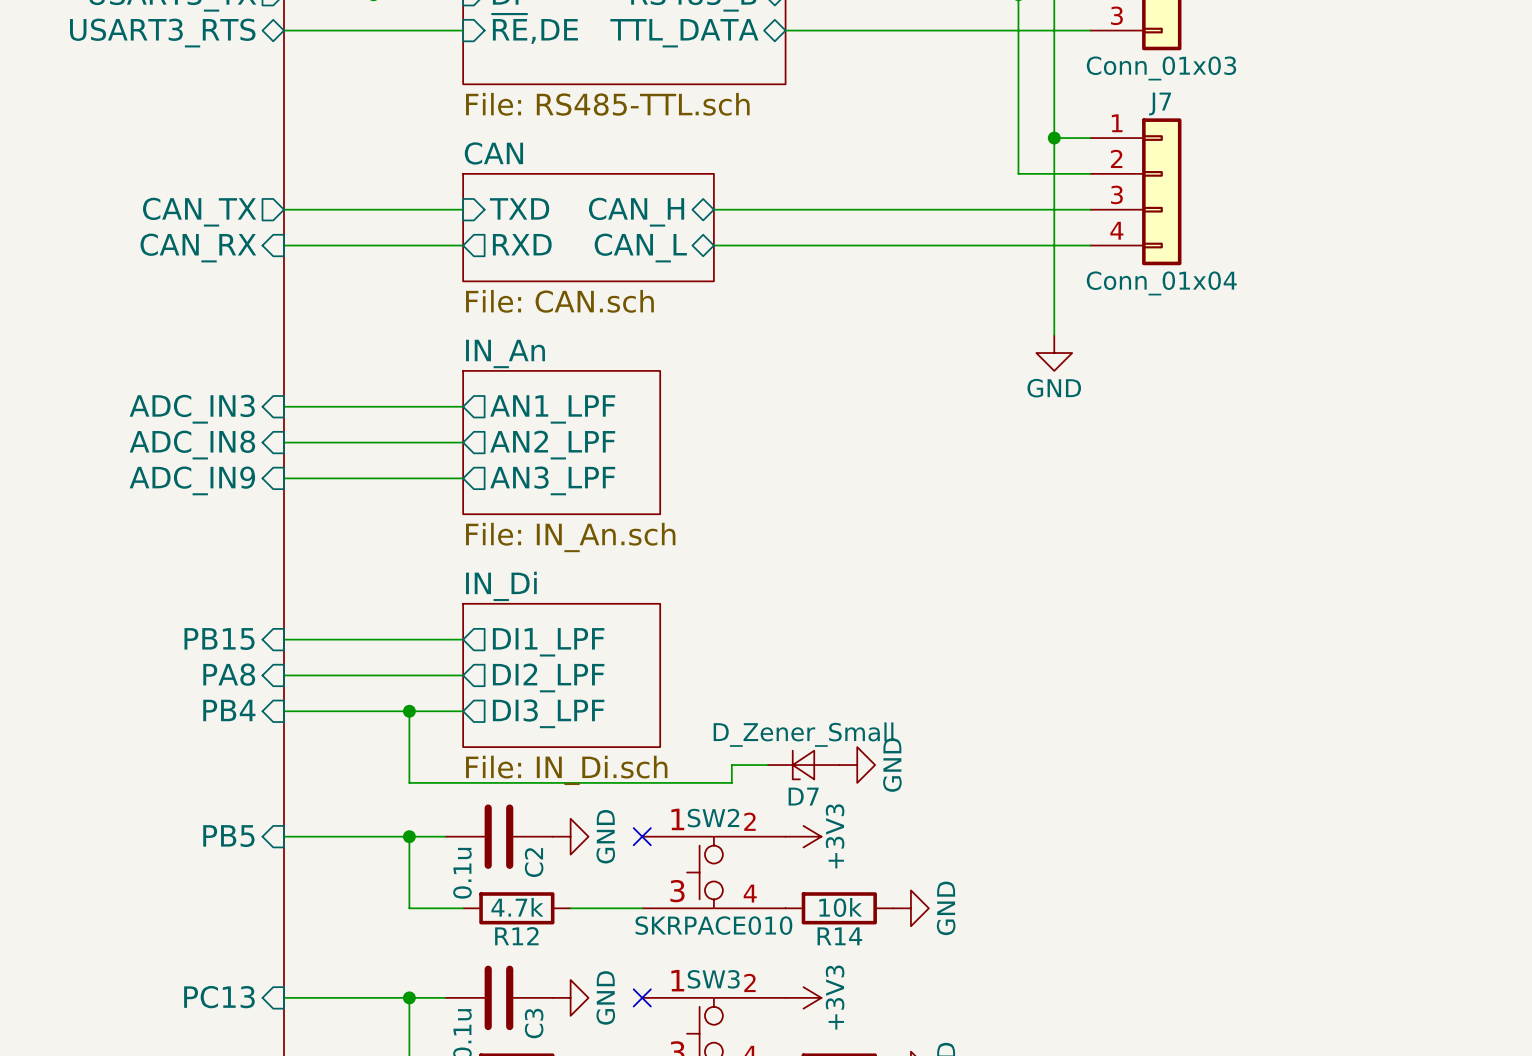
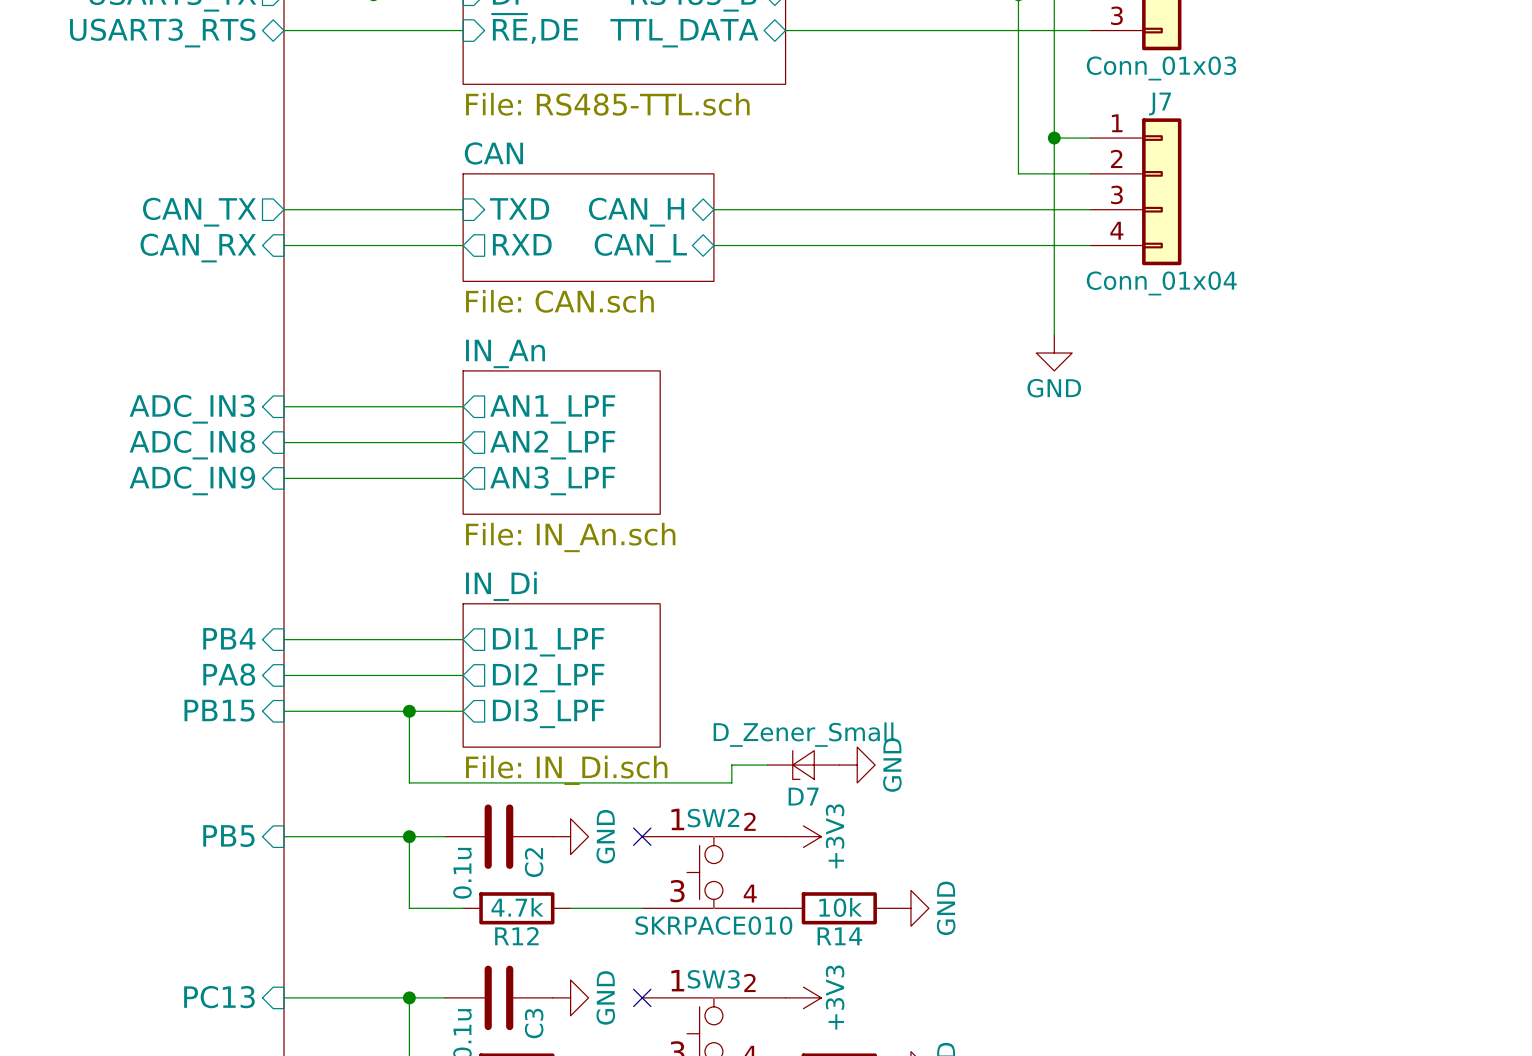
sheet pin: PB15 (219, 639) -> PB4 (229, 638)
sheet pin: PB4 (229, 710) -> PB15 (219, 710)

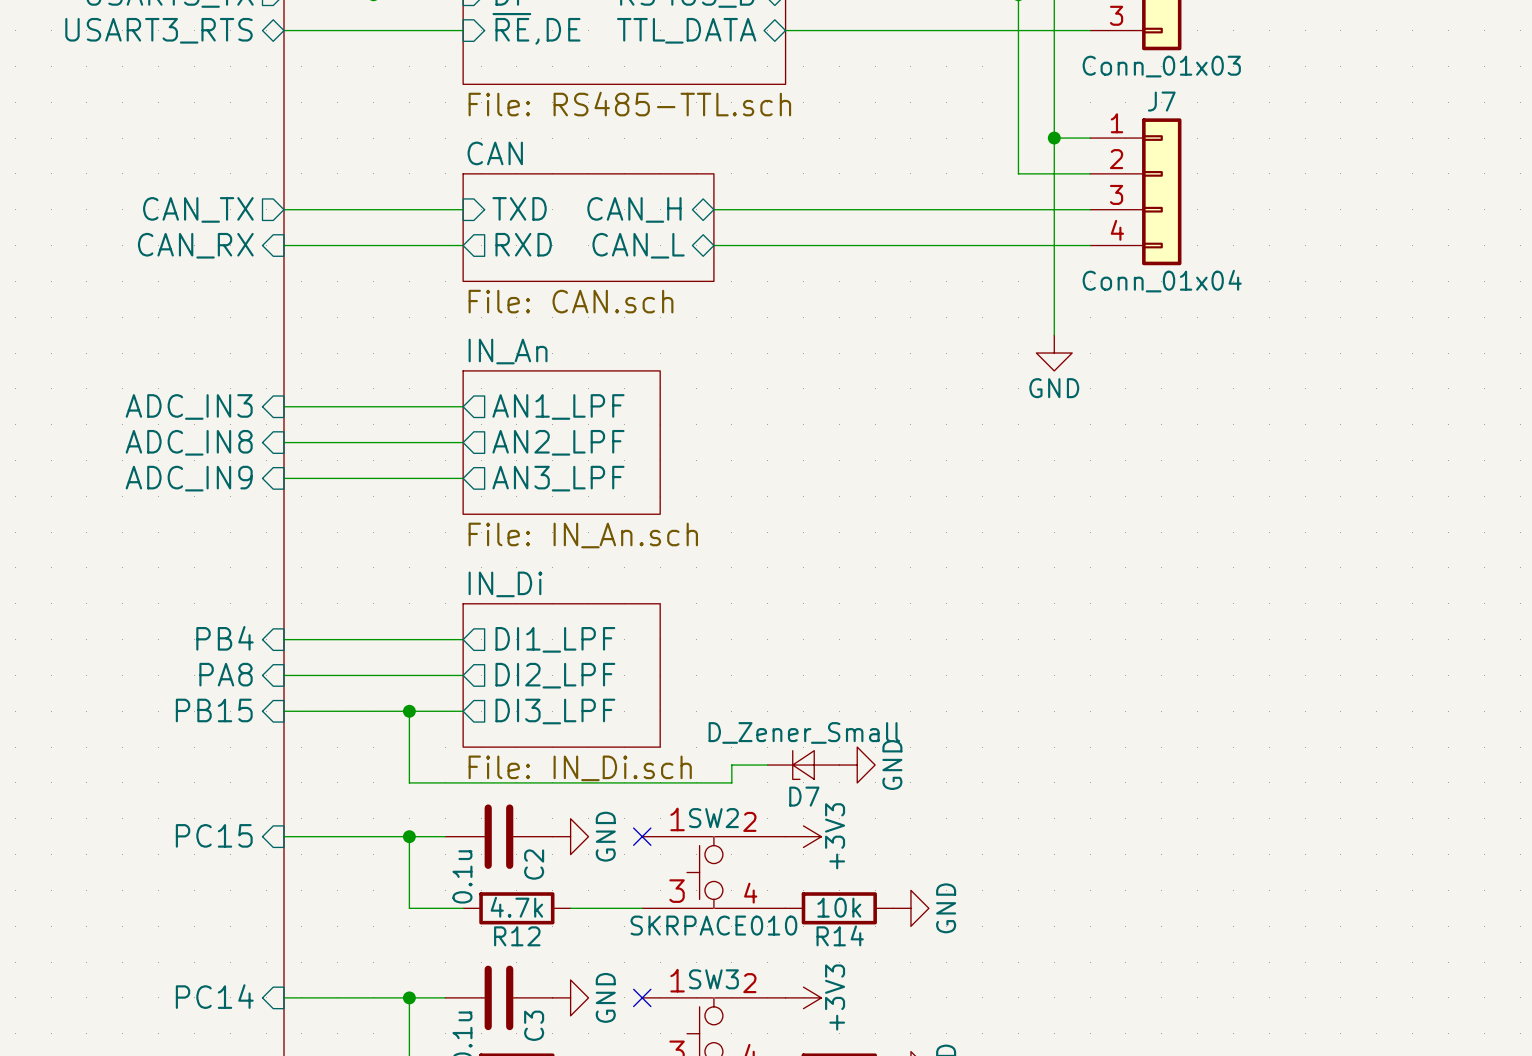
sheet pin: PB5 (228, 836) -> PC15 (214, 835)
sheet pin: PC13 (219, 997) -> PC14 (214, 996)

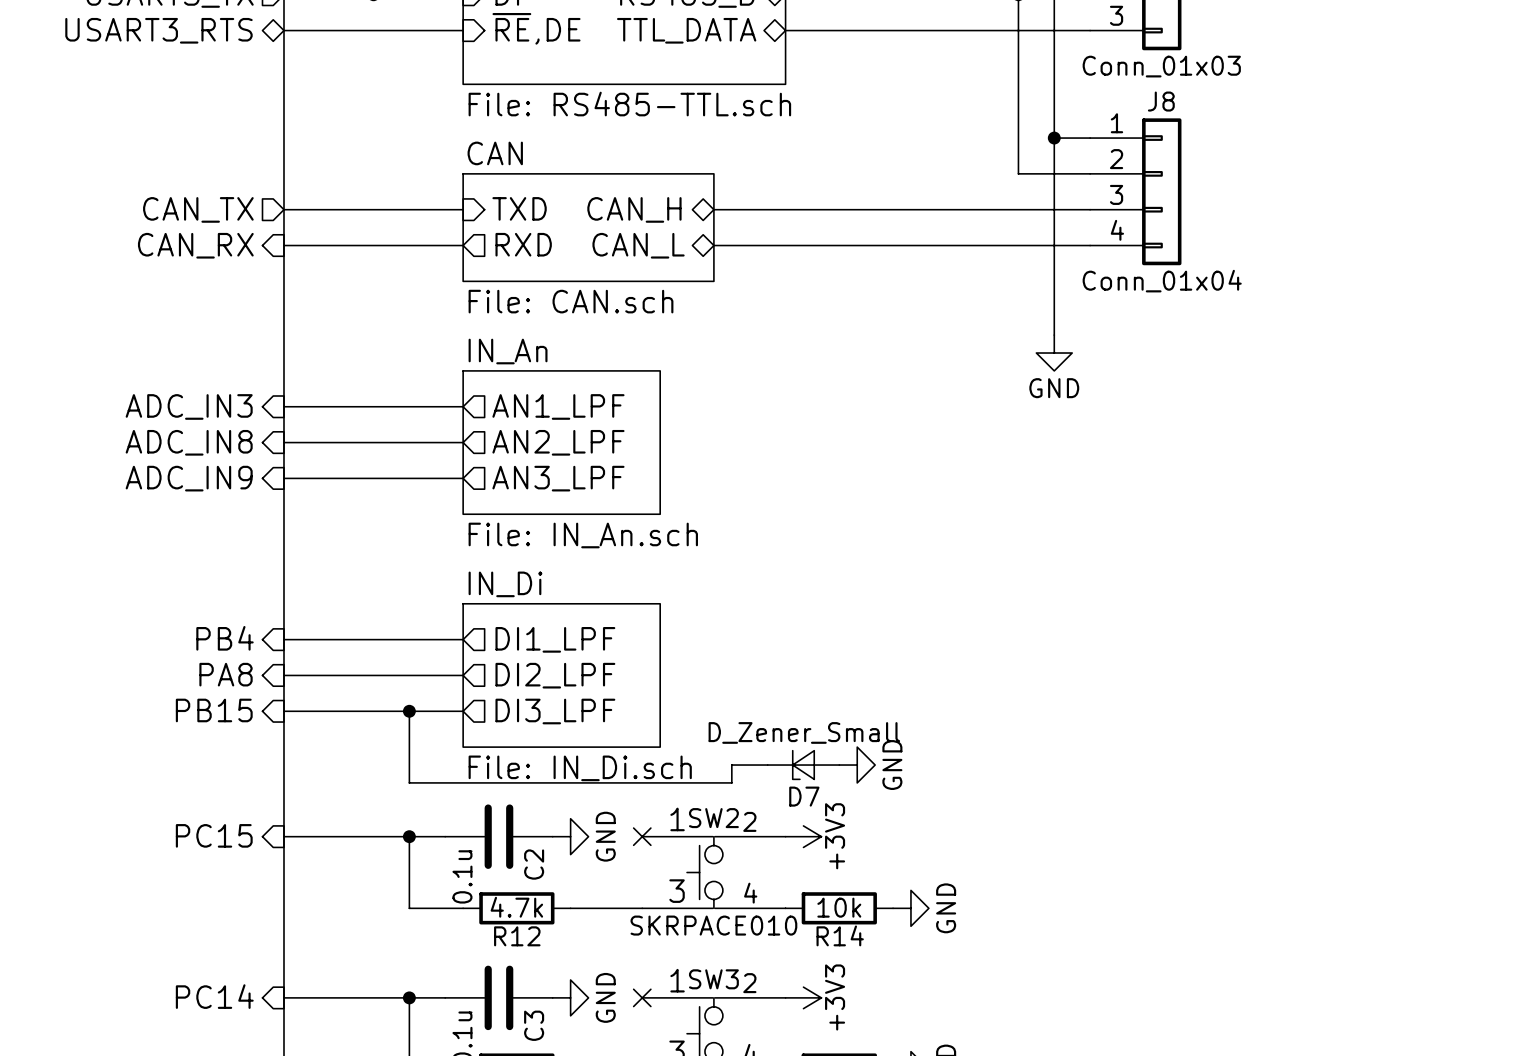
J7 name: J7 (1161, 101) -> J8 (1161, 101)

